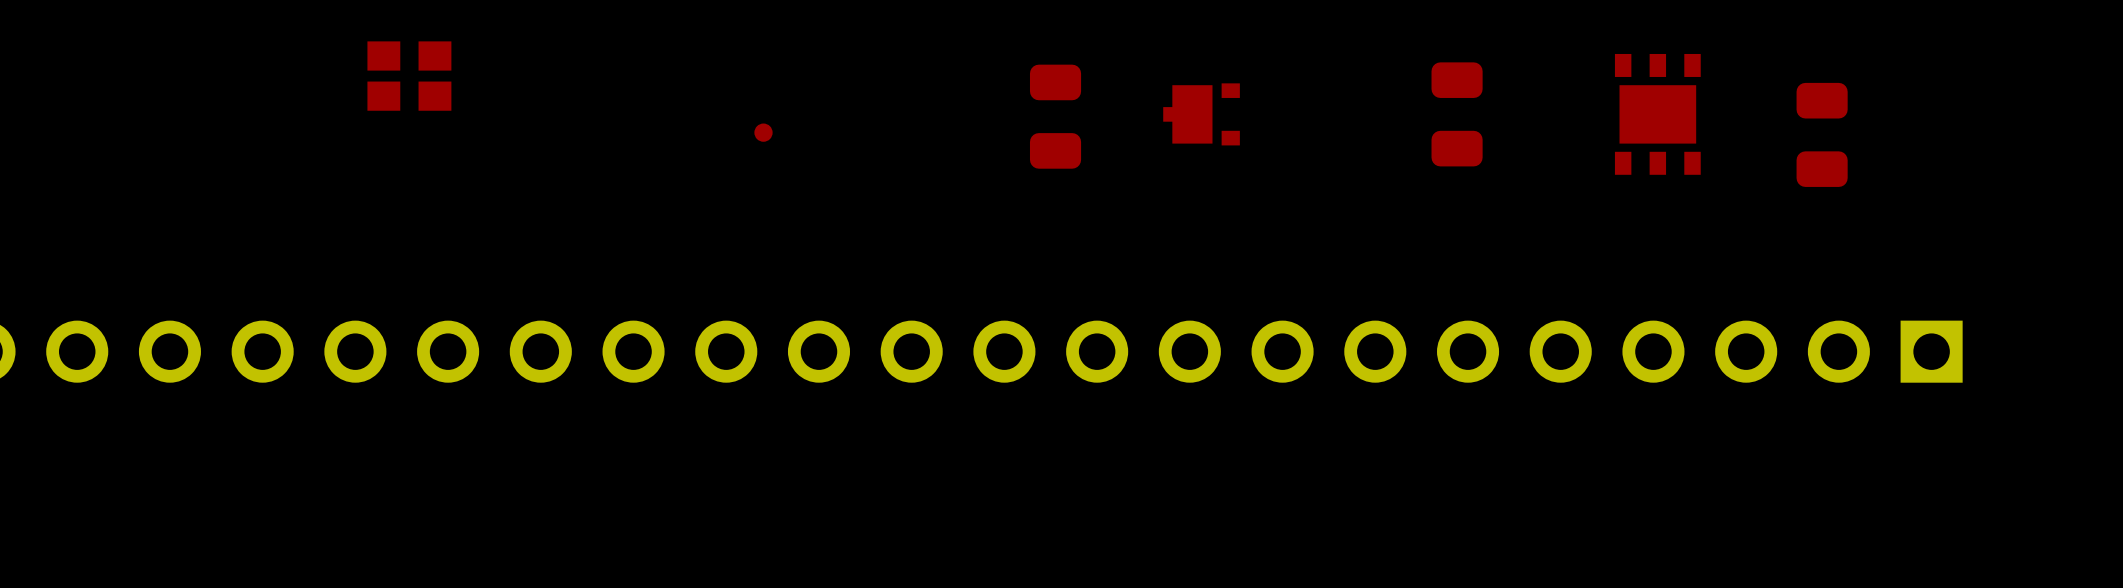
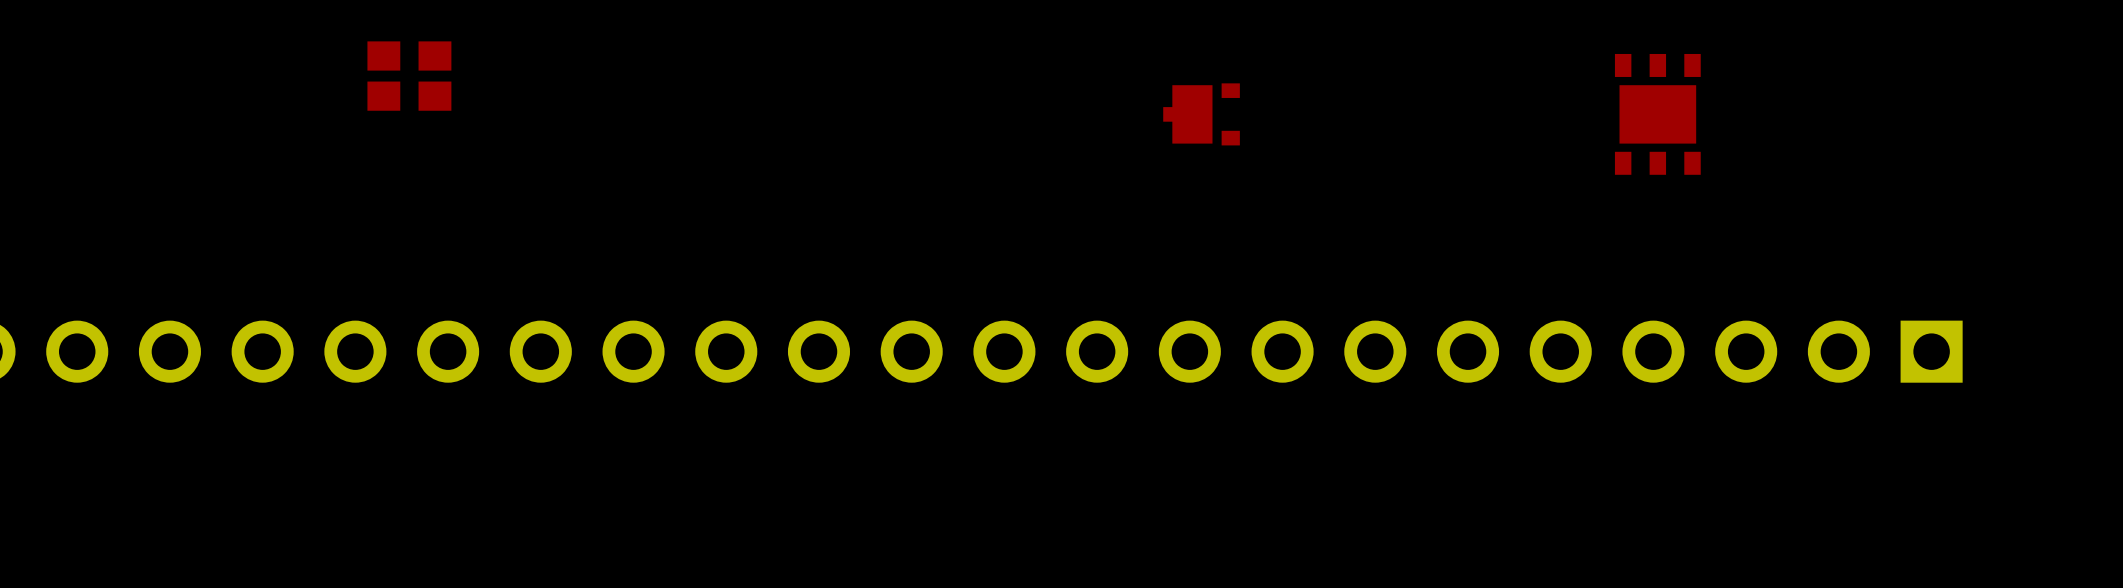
part: (1457, 114) -> none
part: (1055, 116) -> none
part: (763, 132) -> none
part: (1822, 134) -> none

